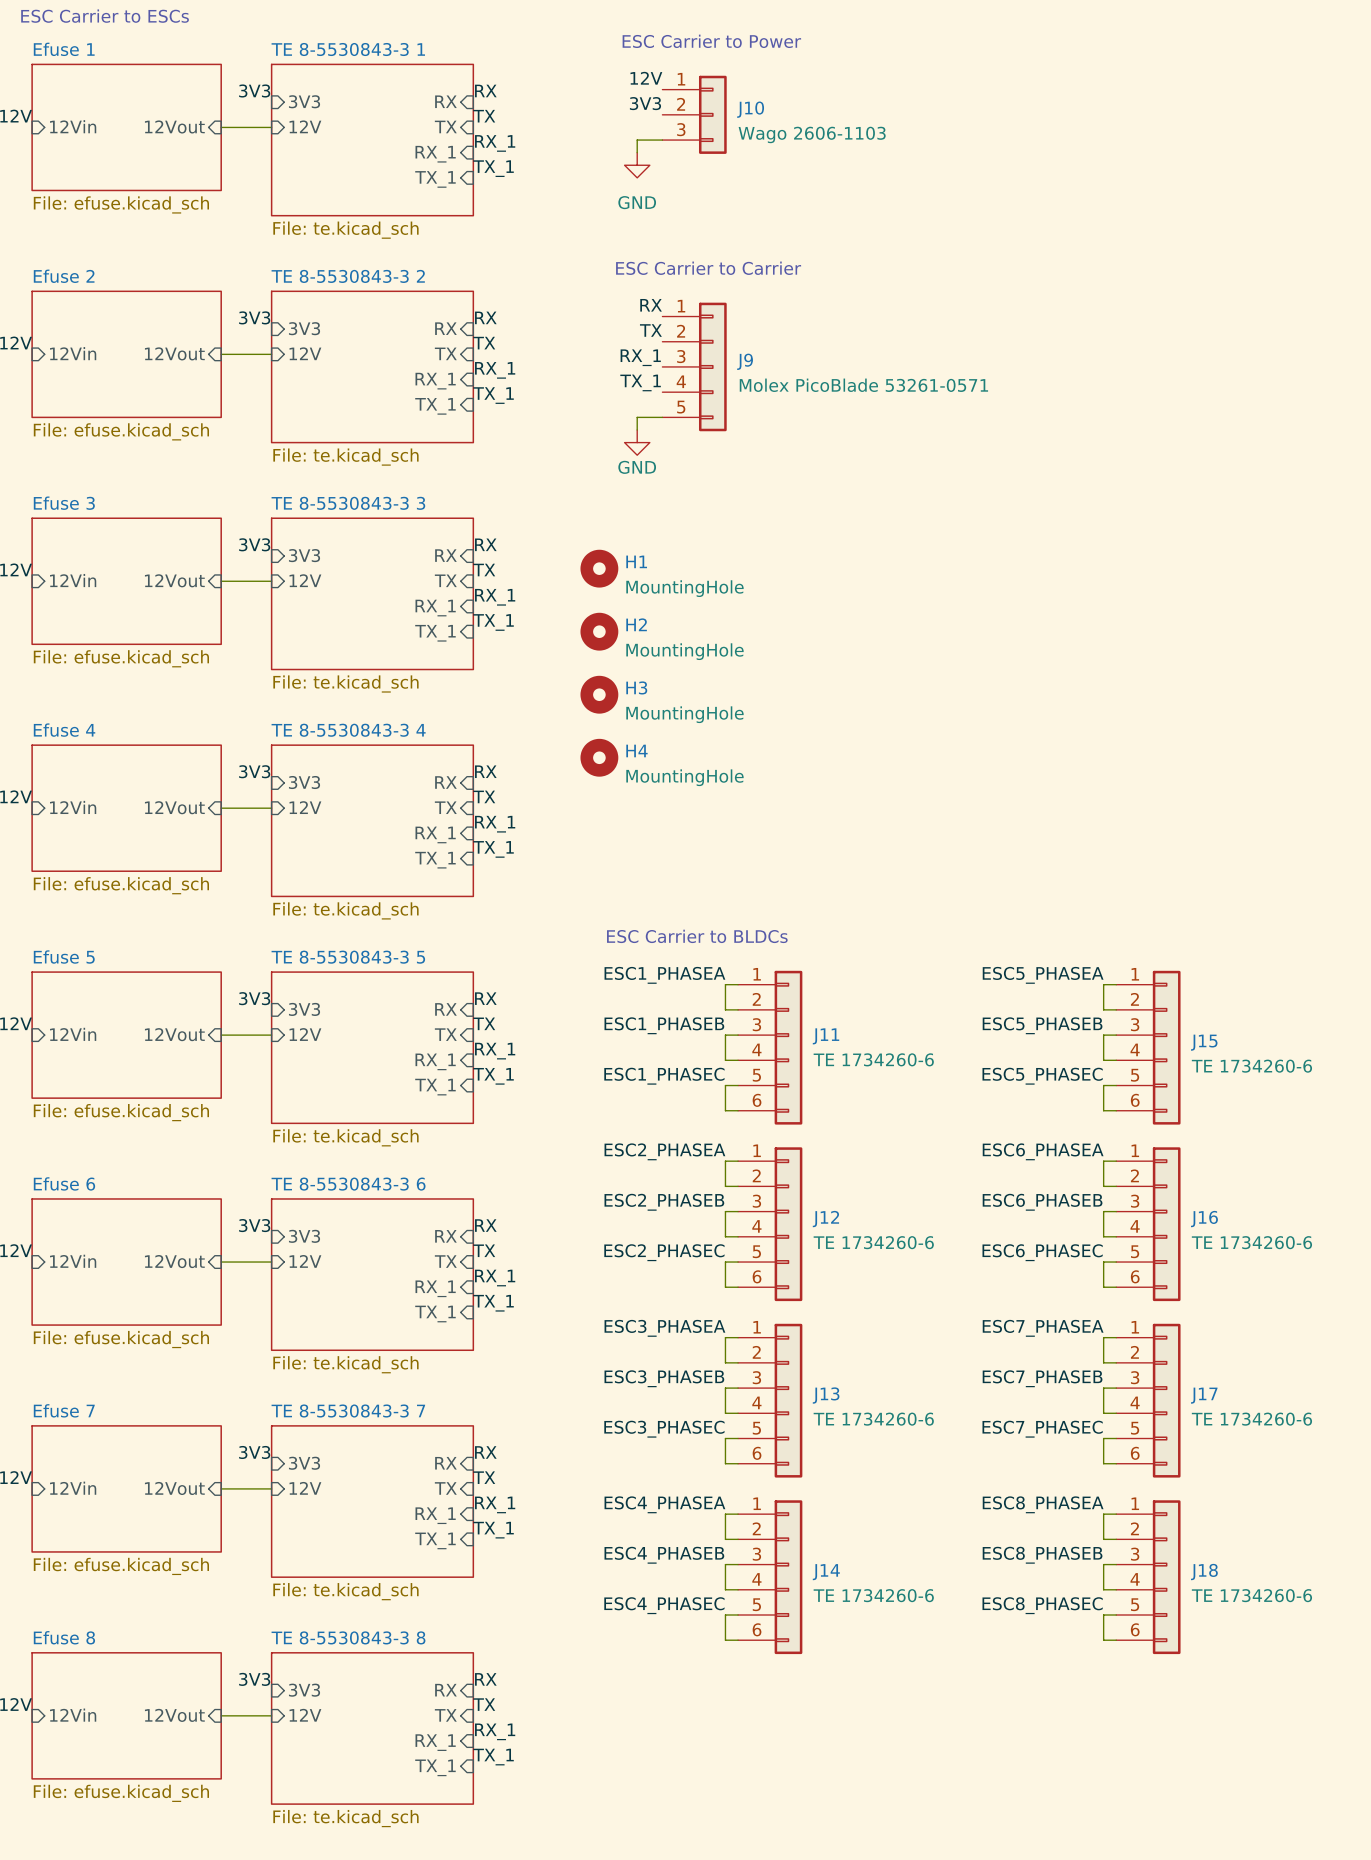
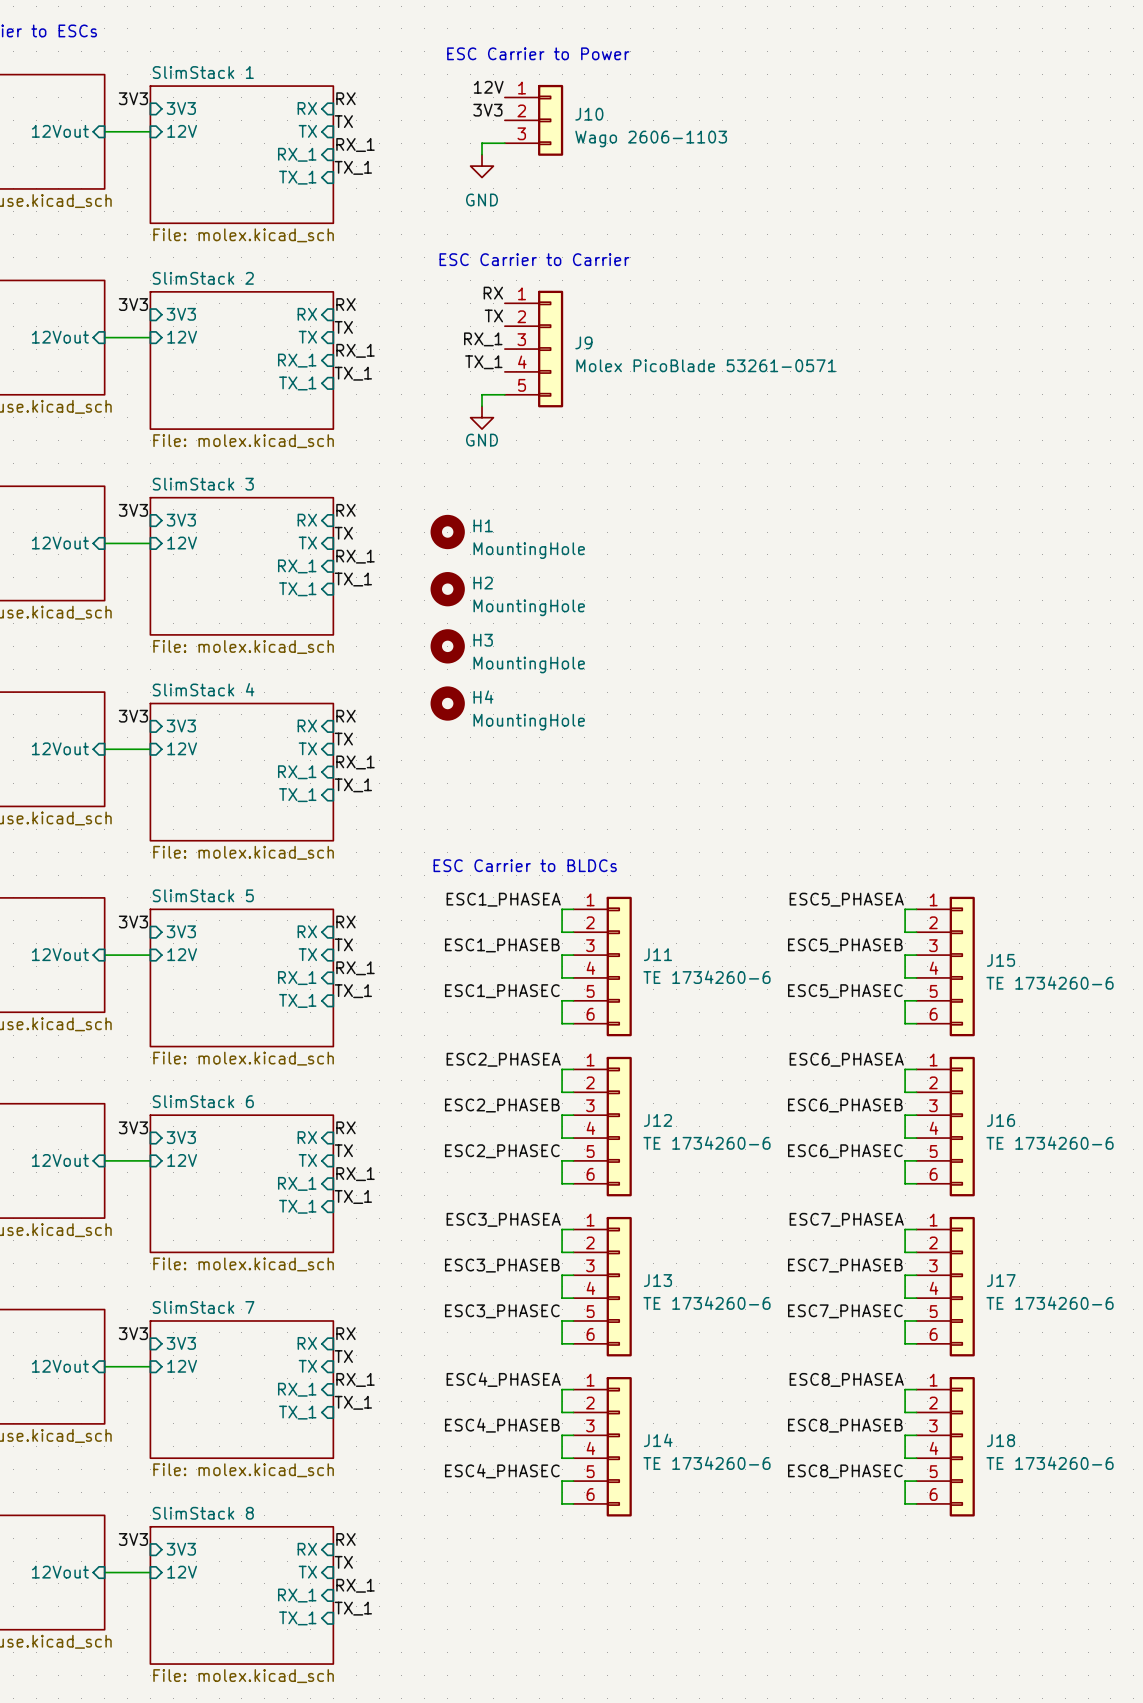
sheet TE 8-5530843-3 1: File: te.kicad_sch (372, 140) -> none
sheet SlimStack 1: none -> File: molex.kicad_sch (241, 154)
sheet TE 8-5530843-3 2: File: te.kicad_sch (372, 366) -> none
sheet SlimStack 2: none -> File: molex.kicad_sch (241, 360)
sheet TE 8-5530843-3 3: File: te.kicad_sch (372, 593) -> none
sheet SlimStack 3: none -> File: molex.kicad_sch (241, 566)
sheet TE 8-5530843-3 4: File: te.kicad_sch (372, 820) -> none
sheet SlimStack 4: none -> File: molex.kicad_sch (241, 772)
sheet TE 8-5530843-3 5: File: te.kicad_sch (372, 1047) -> none
sheet SlimStack 5: none -> File: molex.kicad_sch (241, 977)
sheet TE 8-5530843-3 6: File: te.kicad_sch (372, 1274) -> none
sheet SlimStack 6: none -> File: molex.kicad_sch (241, 1183)
sheet TE 8-5530843-3 7: File: te.kicad_sch (372, 1501) -> none
sheet SlimStack 7: none -> File: molex.kicad_sch (241, 1389)
sheet TE 8-5530843-3 8: File: te.kicad_sch (372, 1728) -> none
sheet SlimStack 8: none -> File: molex.kicad_sch (241, 1595)

